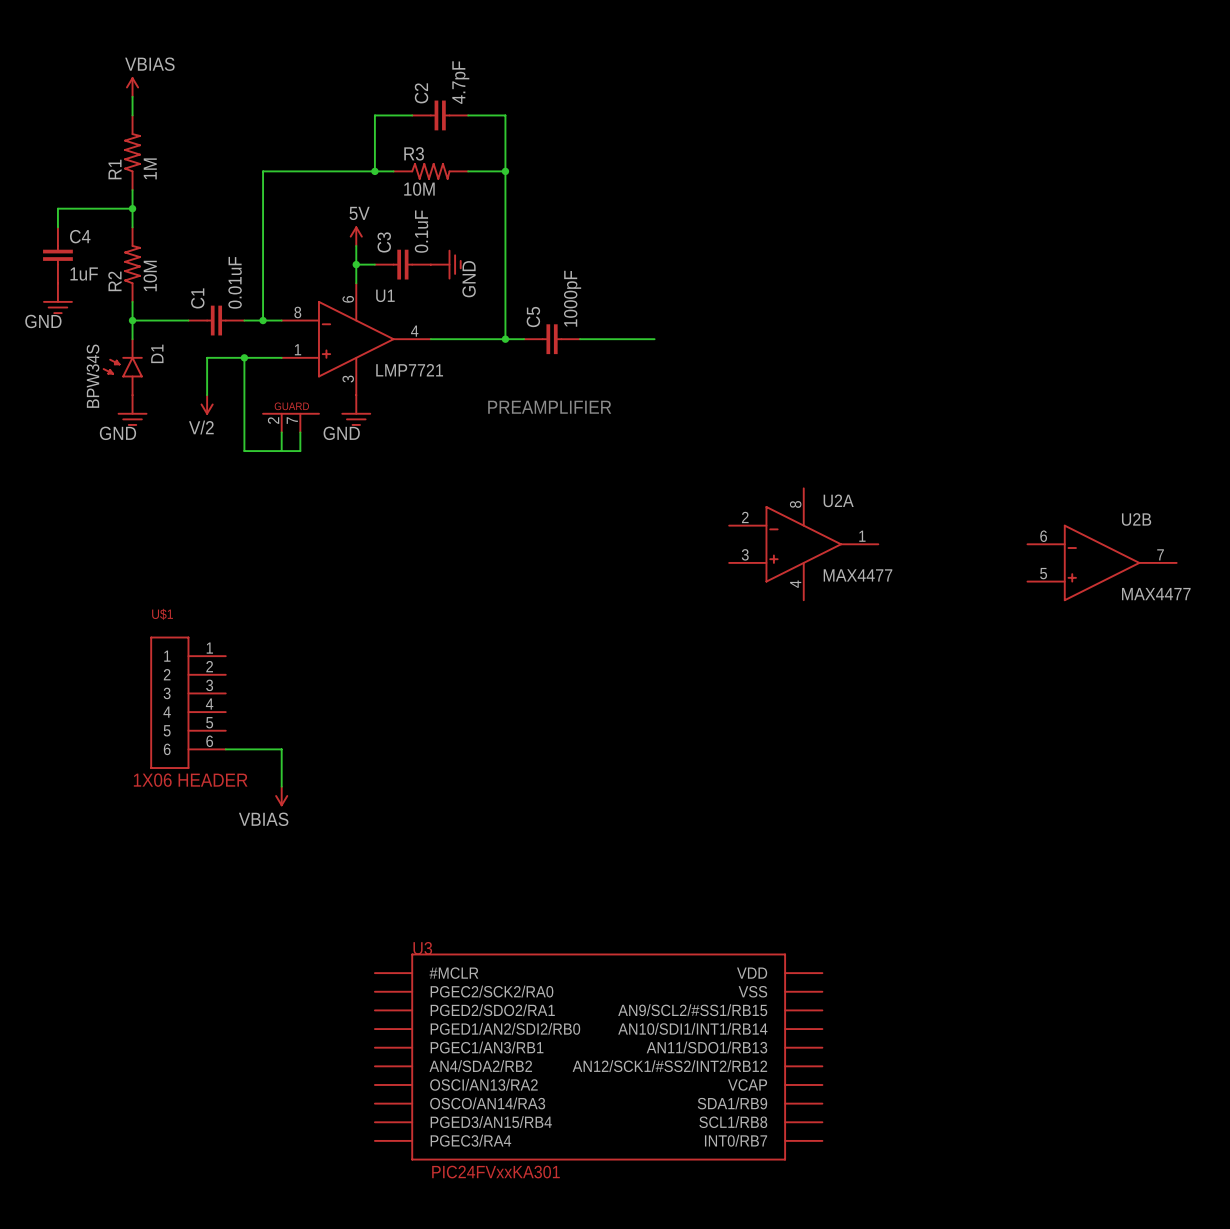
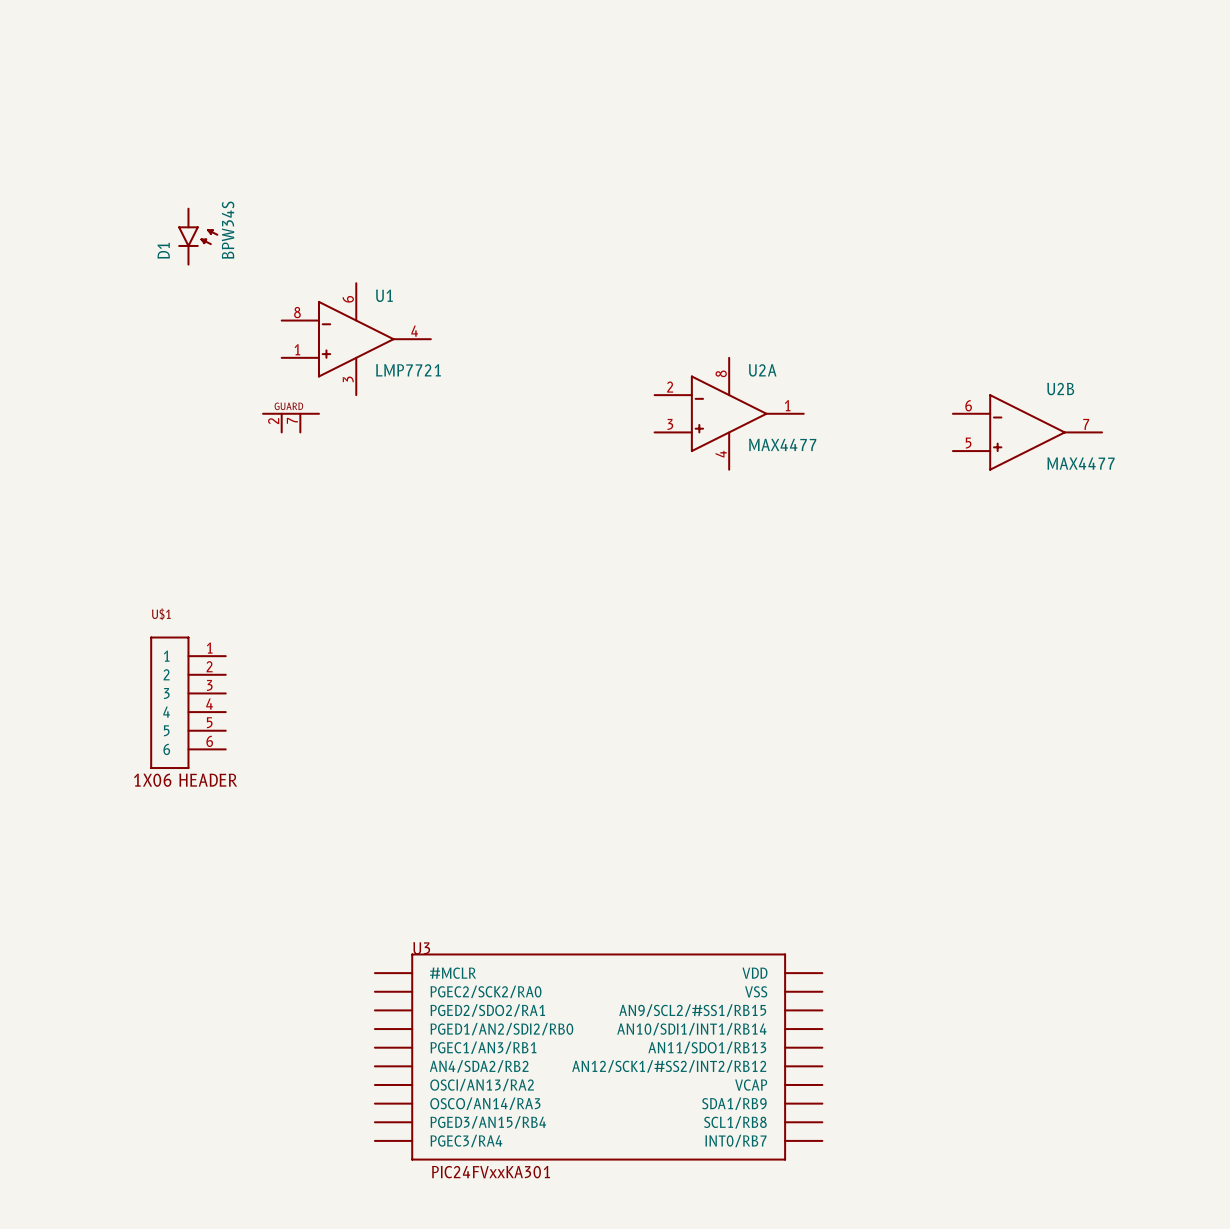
power symbol: VBIAS (132, 87) -> none
wire: (132, 96) (132, 115) -> none
wire: (412, 115) (374, 115) (374, 171) -> none
C2: 4.7pF (440, 115) -> none
wire: (468, 115) (505, 115) (505, 339) -> none
R1: 1M (132, 152) -> none
junction: (374, 171) -> none
wire: (393, 171) (263, 171) (263, 320) -> none
R3: 10M (430, 171) -> none
wire: (468, 171) (505, 171) -> none
junction: (505, 171) -> none
wire: (132, 190) (132, 227) -> none
wire: (132, 208) (57, 208) (57, 227) -> none
junction: (132, 208) -> none
power symbol: 5V (356, 236) -> none
wire: (356, 245) (356, 283) -> none
C4: 1uF (57, 255) -> none
R2: 10M (132, 264) -> none
wire: (356, 264) (374, 264) -> none
junction: (356, 264) -> none
C3: 0.1uF (402, 264) -> none
power symbol: GND (446, 264) -> none
power symbol: GND (57, 298) -> none
wire: (132, 301) (132, 339) -> none
wire: (132, 320) (188, 320) -> none
junction: (132, 320) -> none
C1: 0.01uF (216, 320) -> none
wire: (244, 320) (281, 320) -> none
junction: (263, 320) -> none
wire: (430, 339) (524, 339) -> none
junction: (505, 339) -> none
C5: 1000pF (552, 339) -> none
wire: (580, 339) (654, 339) -> none
wire: (244, 357) (244, 451) (300, 451) (300, 432) -> none
junction: (244, 357) -> none
wire: (281, 357) (207, 357) (207, 395) -> none
D1 rotation: 0° (122, 367) -> 180° (198, 236)
D1 position: (122, 367) -> (198, 236)
power symbol: V/2 (207, 404) -> none
text: PREAMPLIFIER (549, 407) -> none
power symbol: GND (132, 410) -> none
power symbol: GND (356, 410) -> none
wire: (281, 432) (281, 451) -> none
U2A position: (803, 544) -> (729, 413)
U2B position: (1102, 562) -> (1027, 432)
wire: (225, 749) (281, 749) (281, 786) -> none
power symbol: VBIAS (281, 796) -> none

